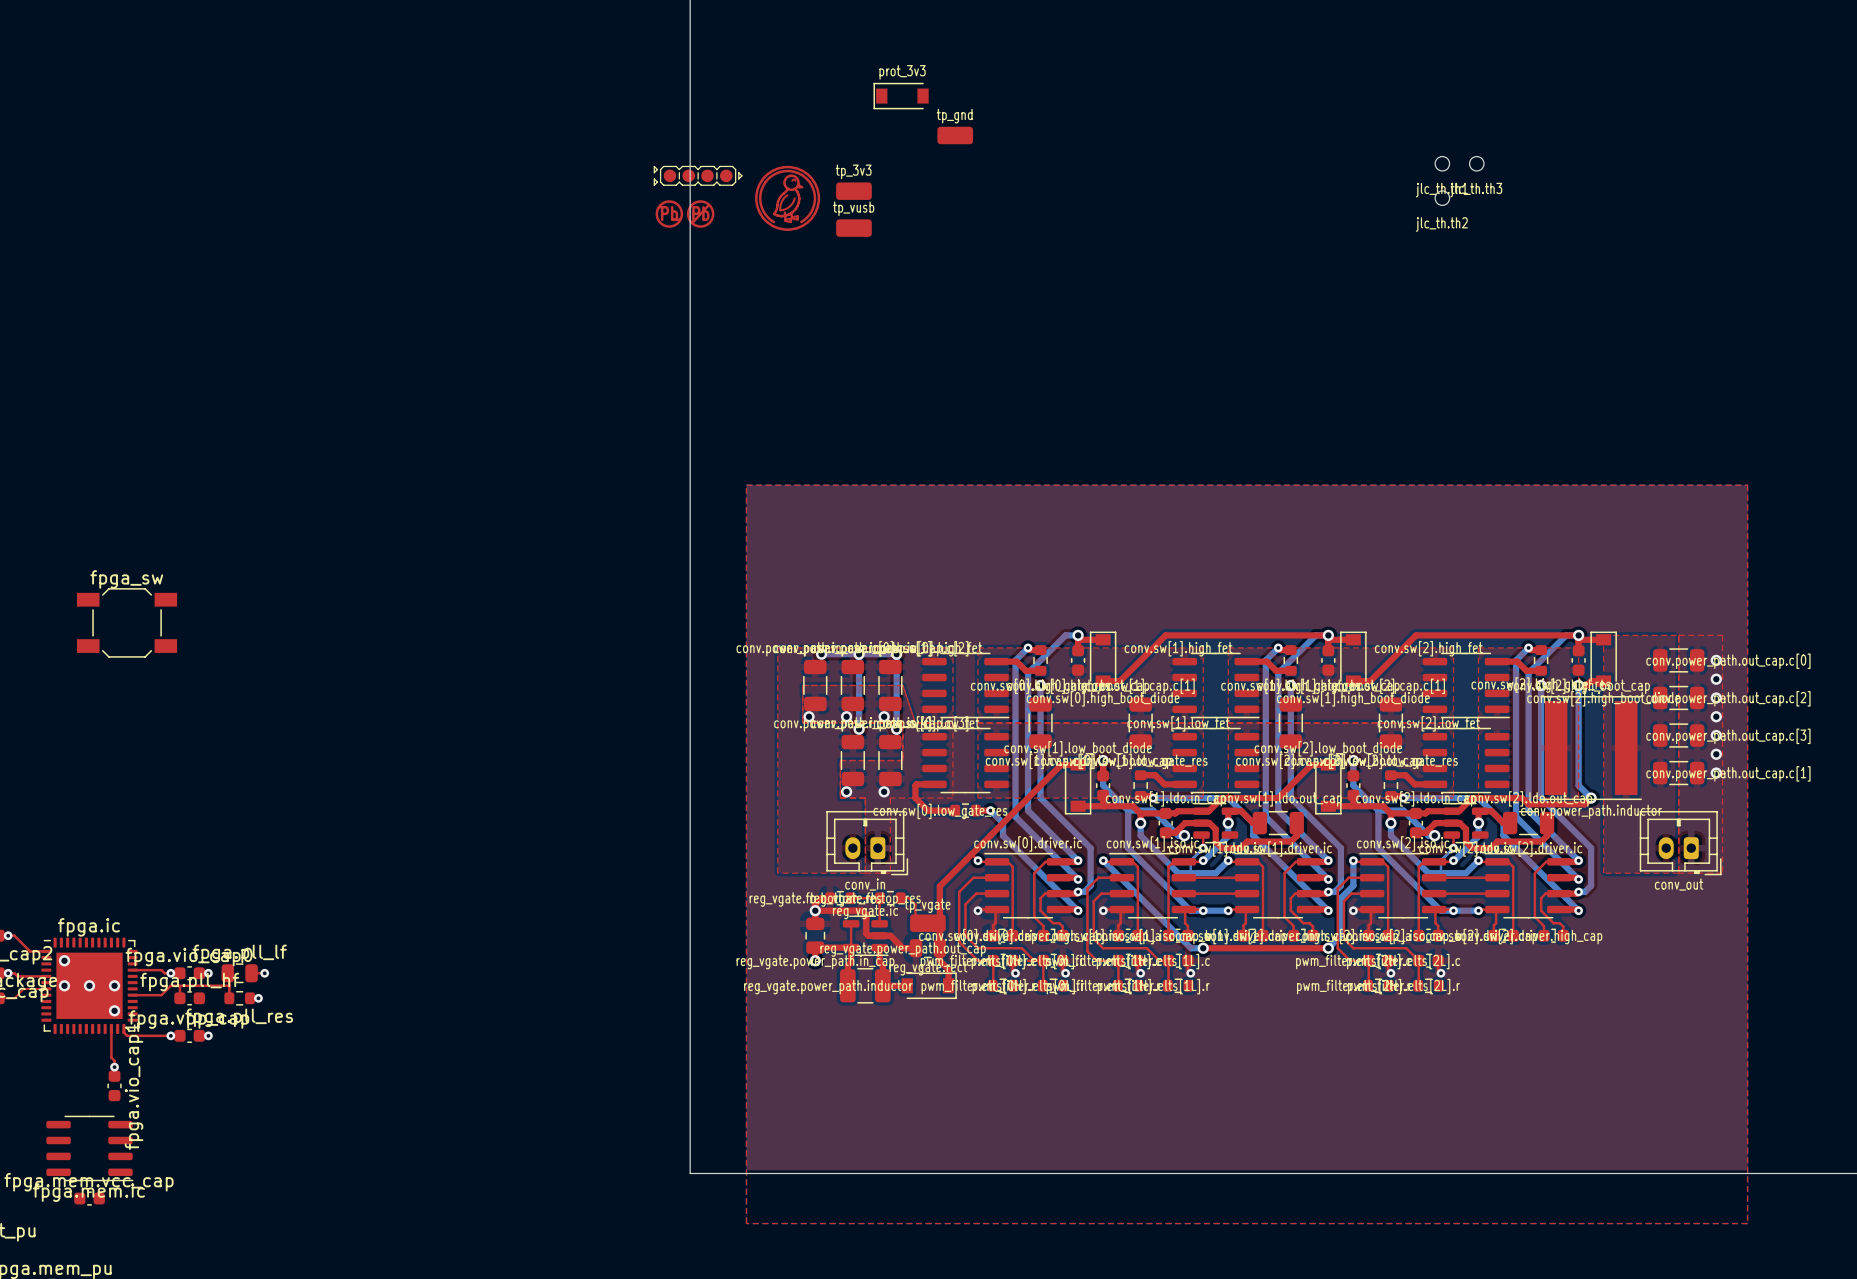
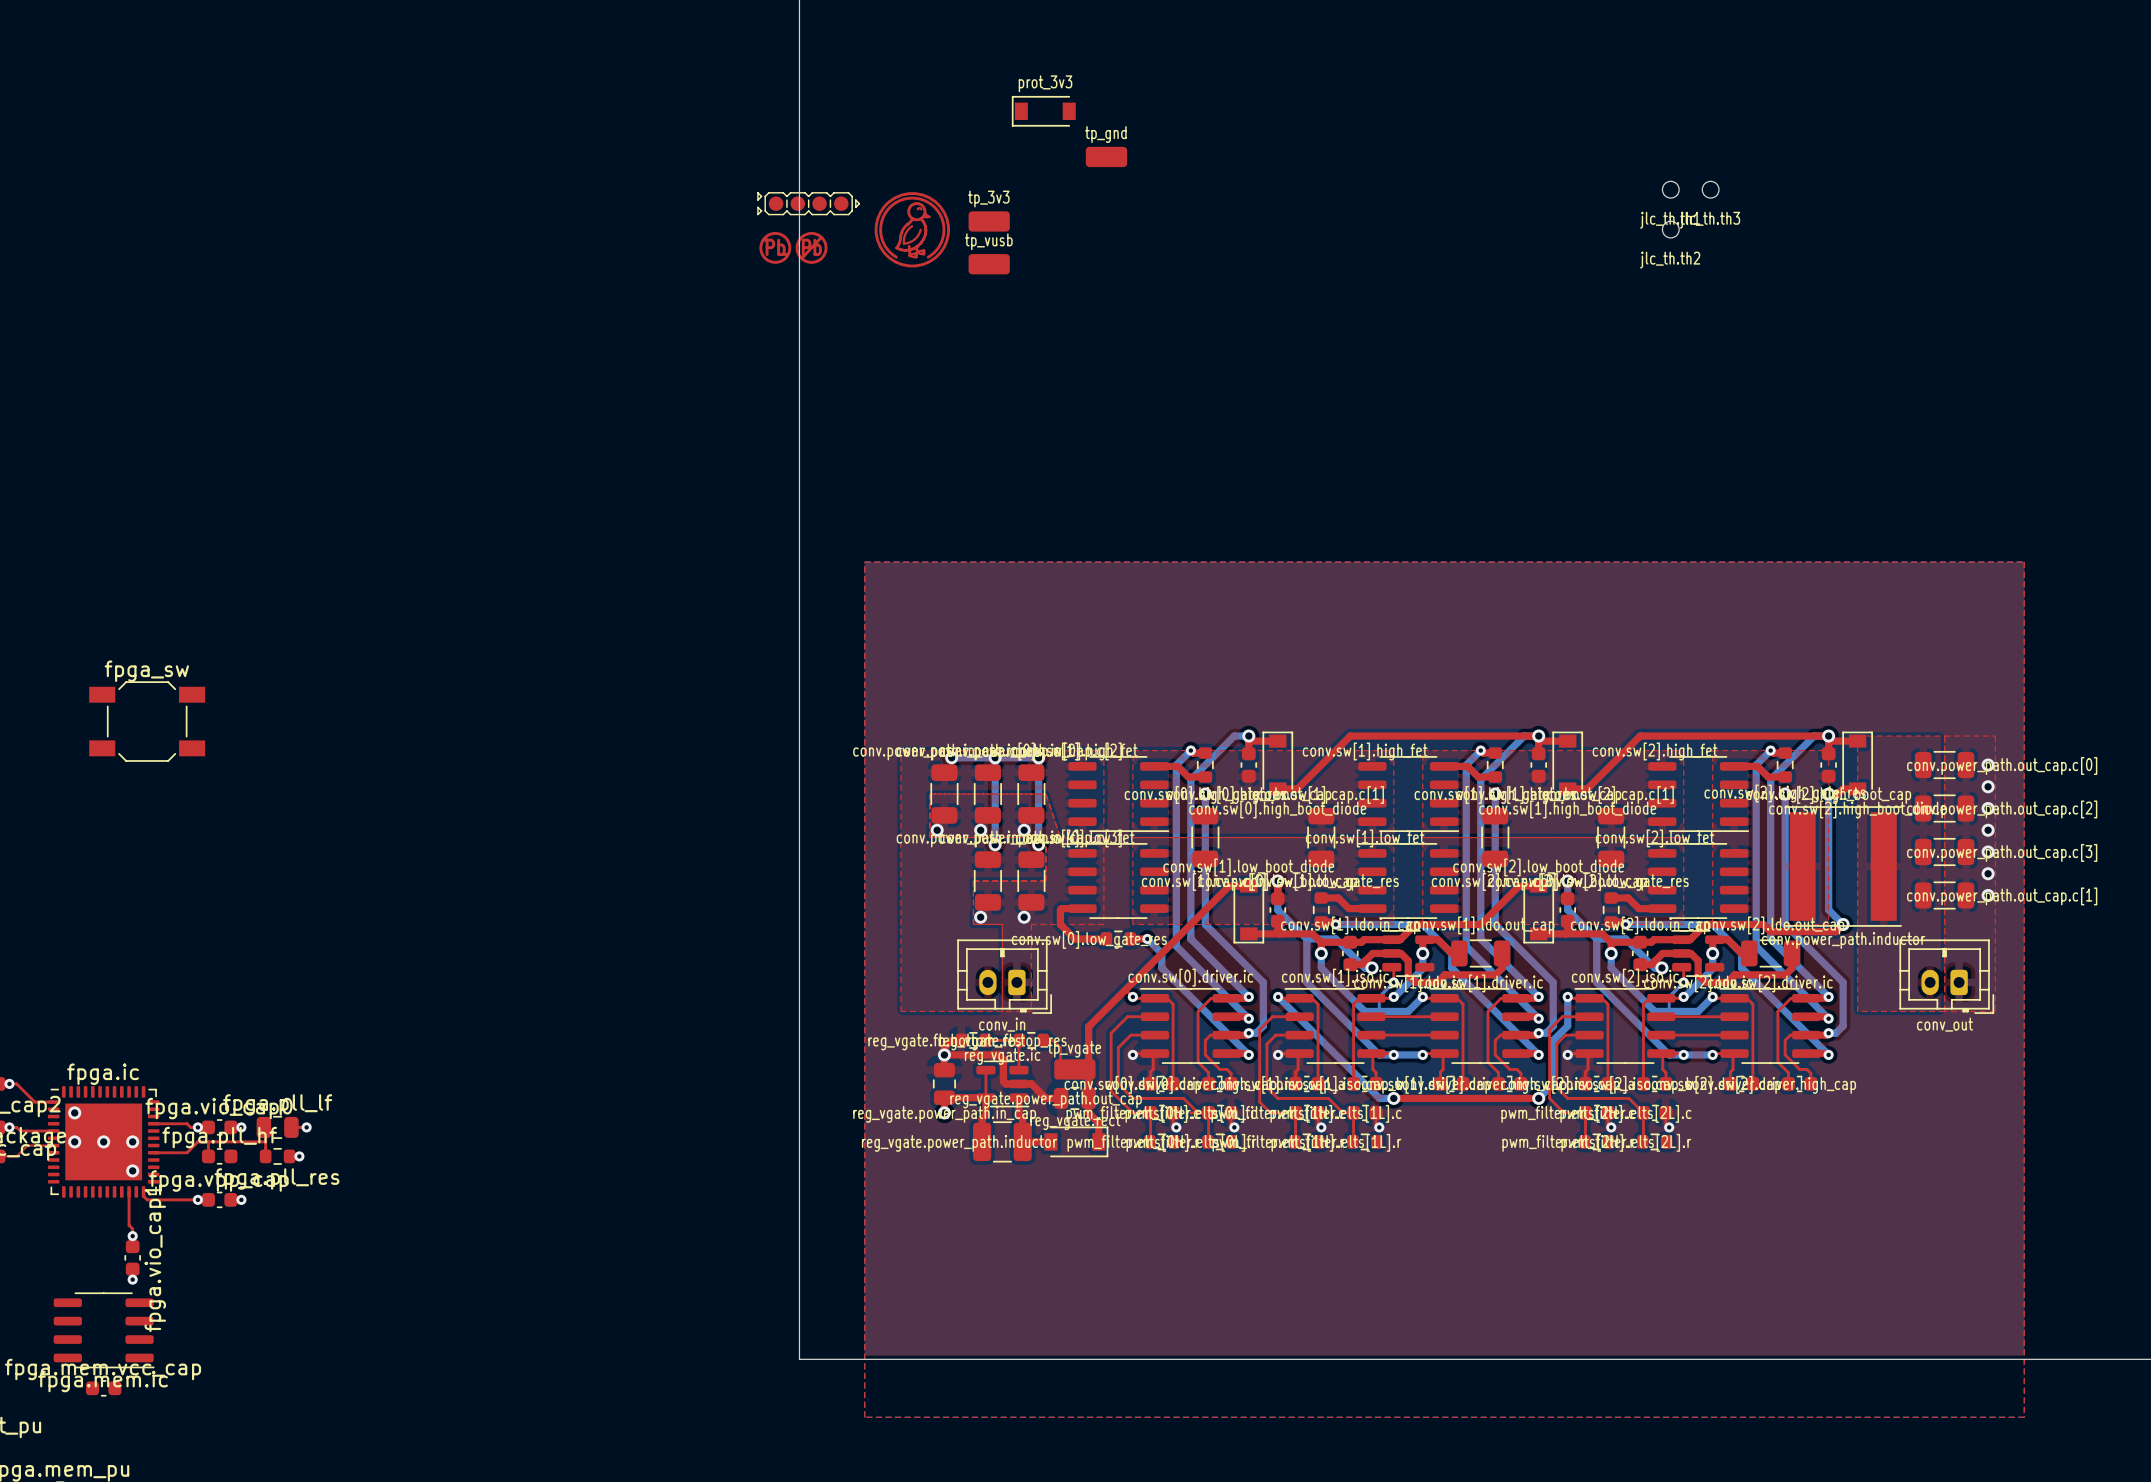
via: none -> (132, 1279)

